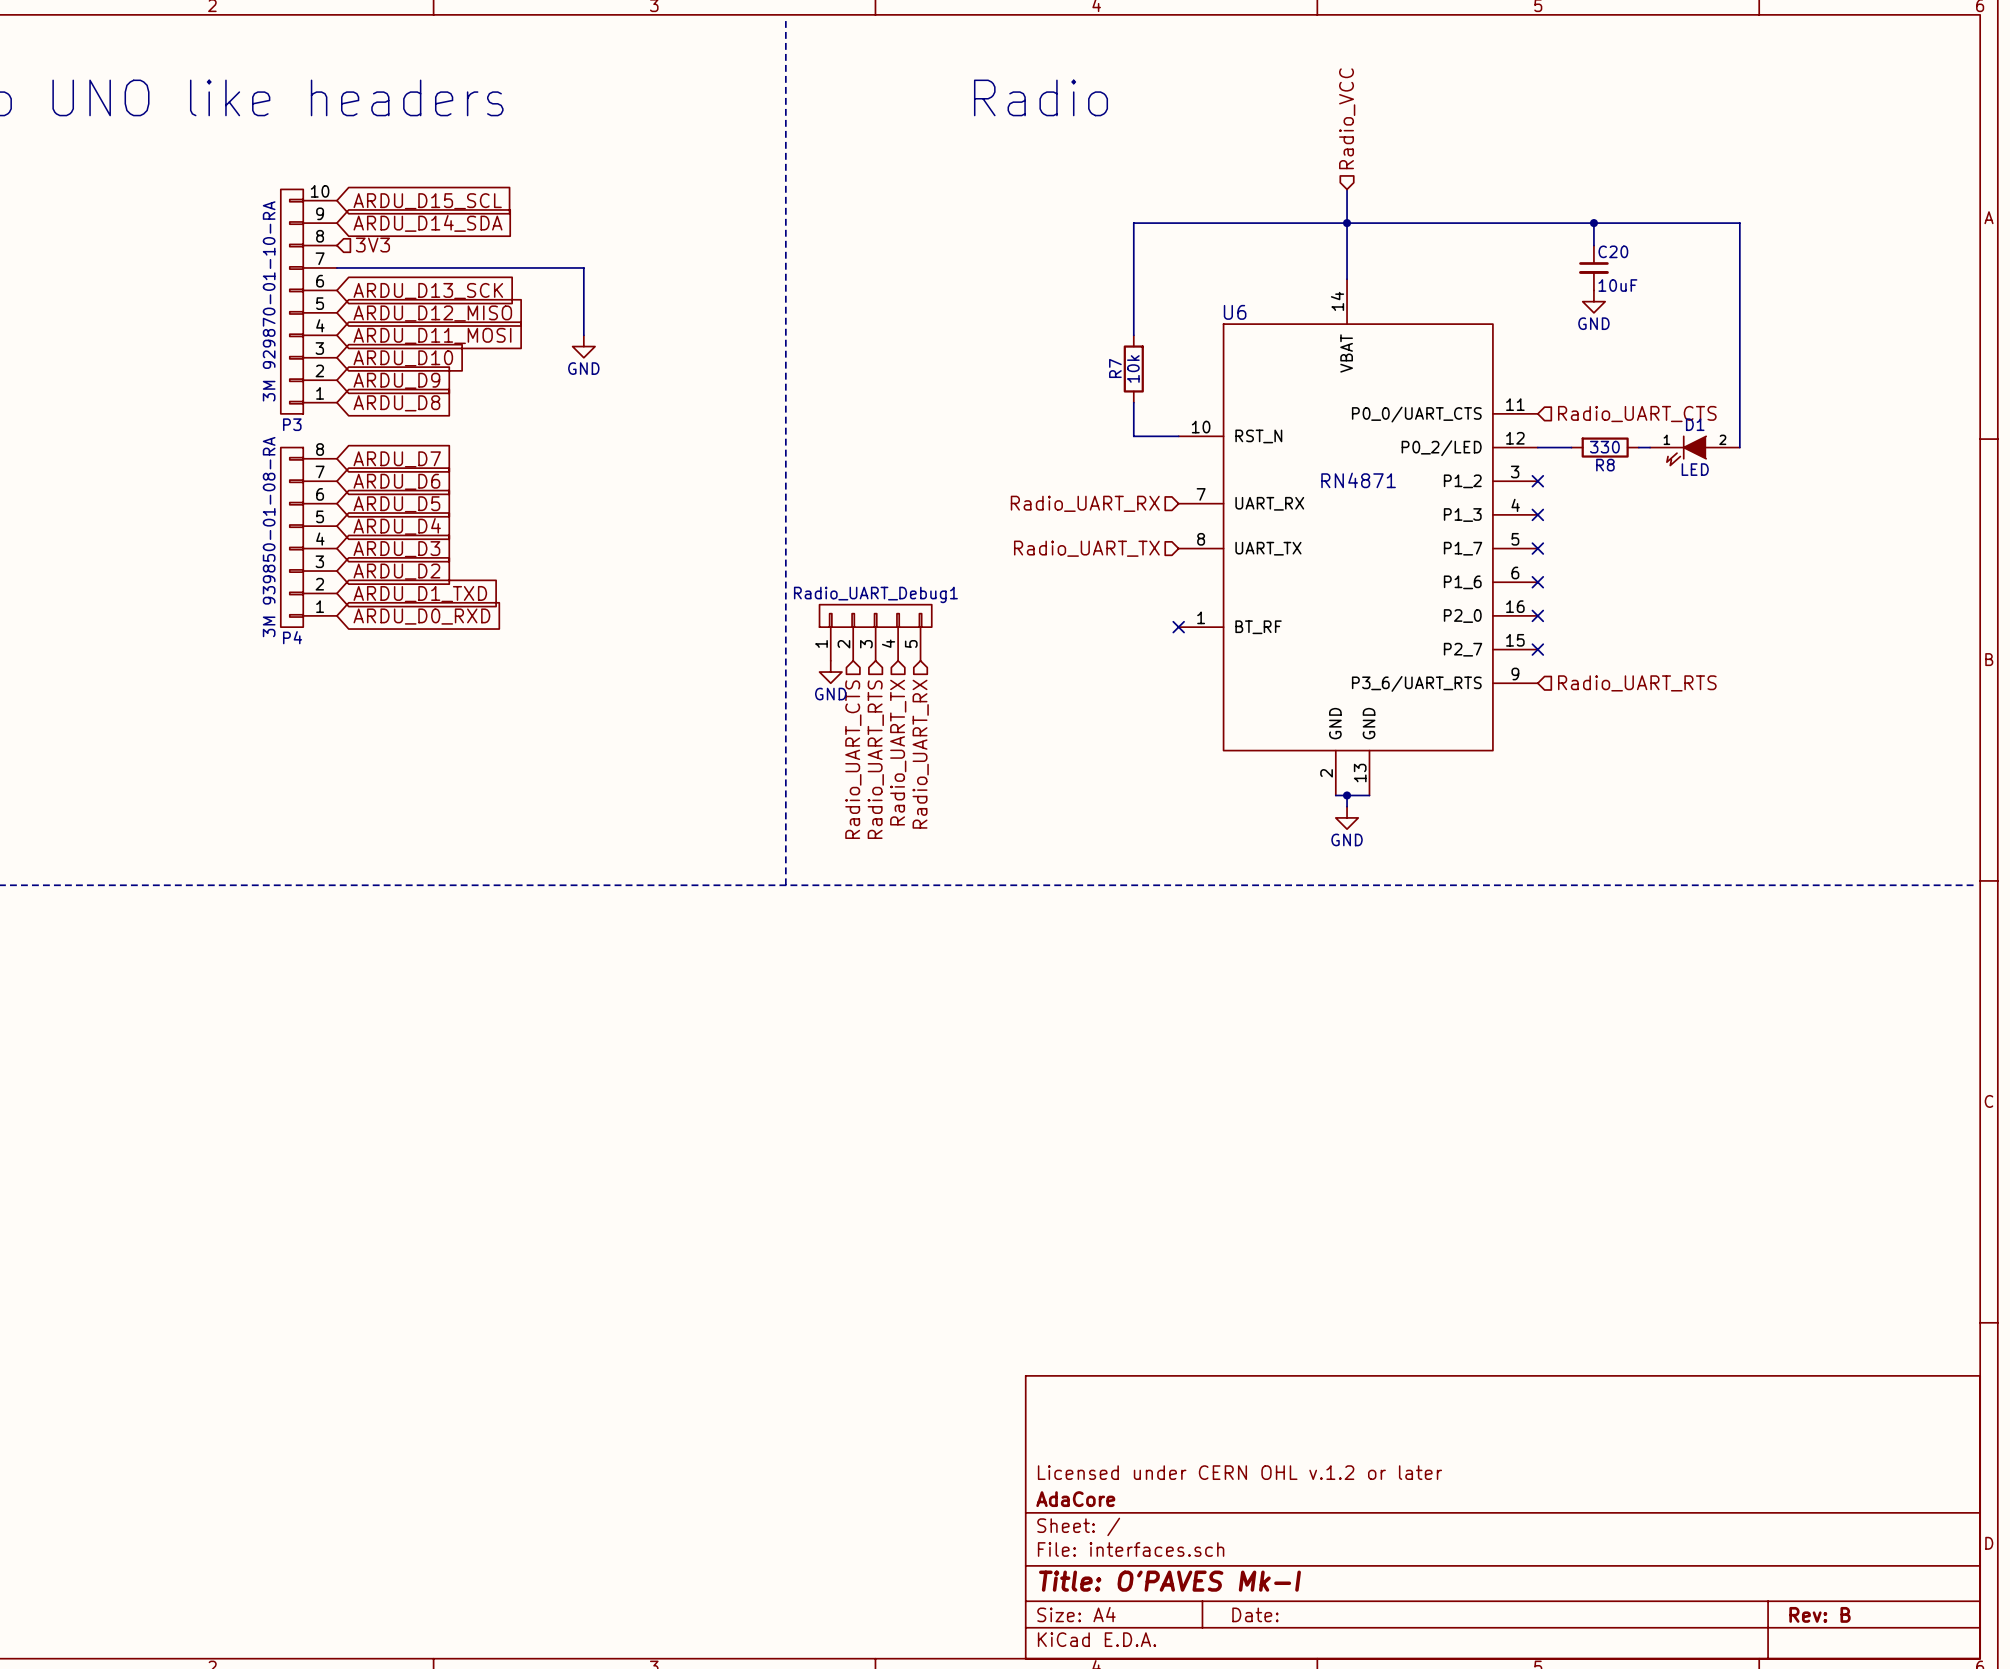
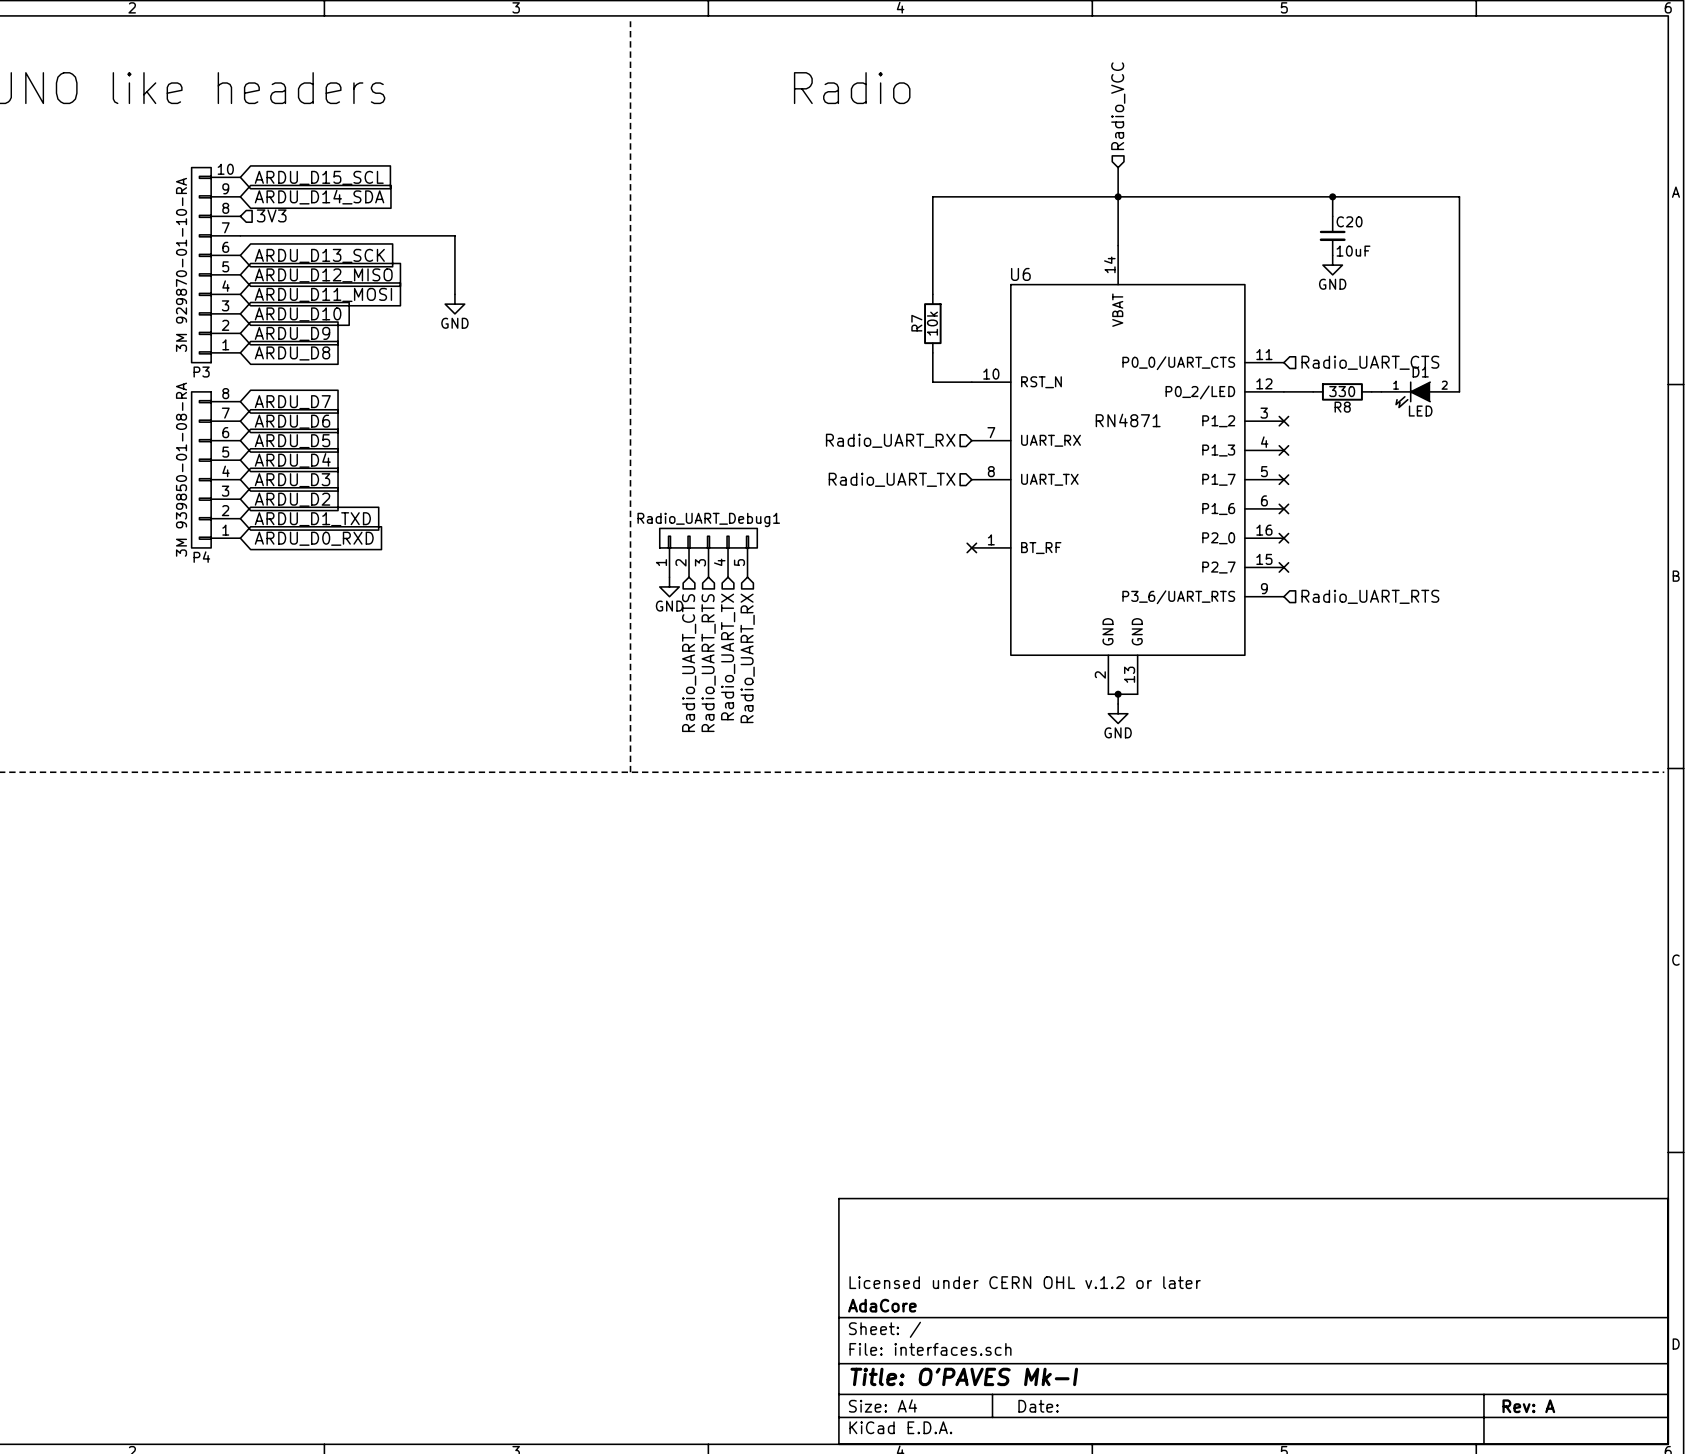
title block: Rev: B (1819, 1614) -> Rev: A (1528, 1406)

